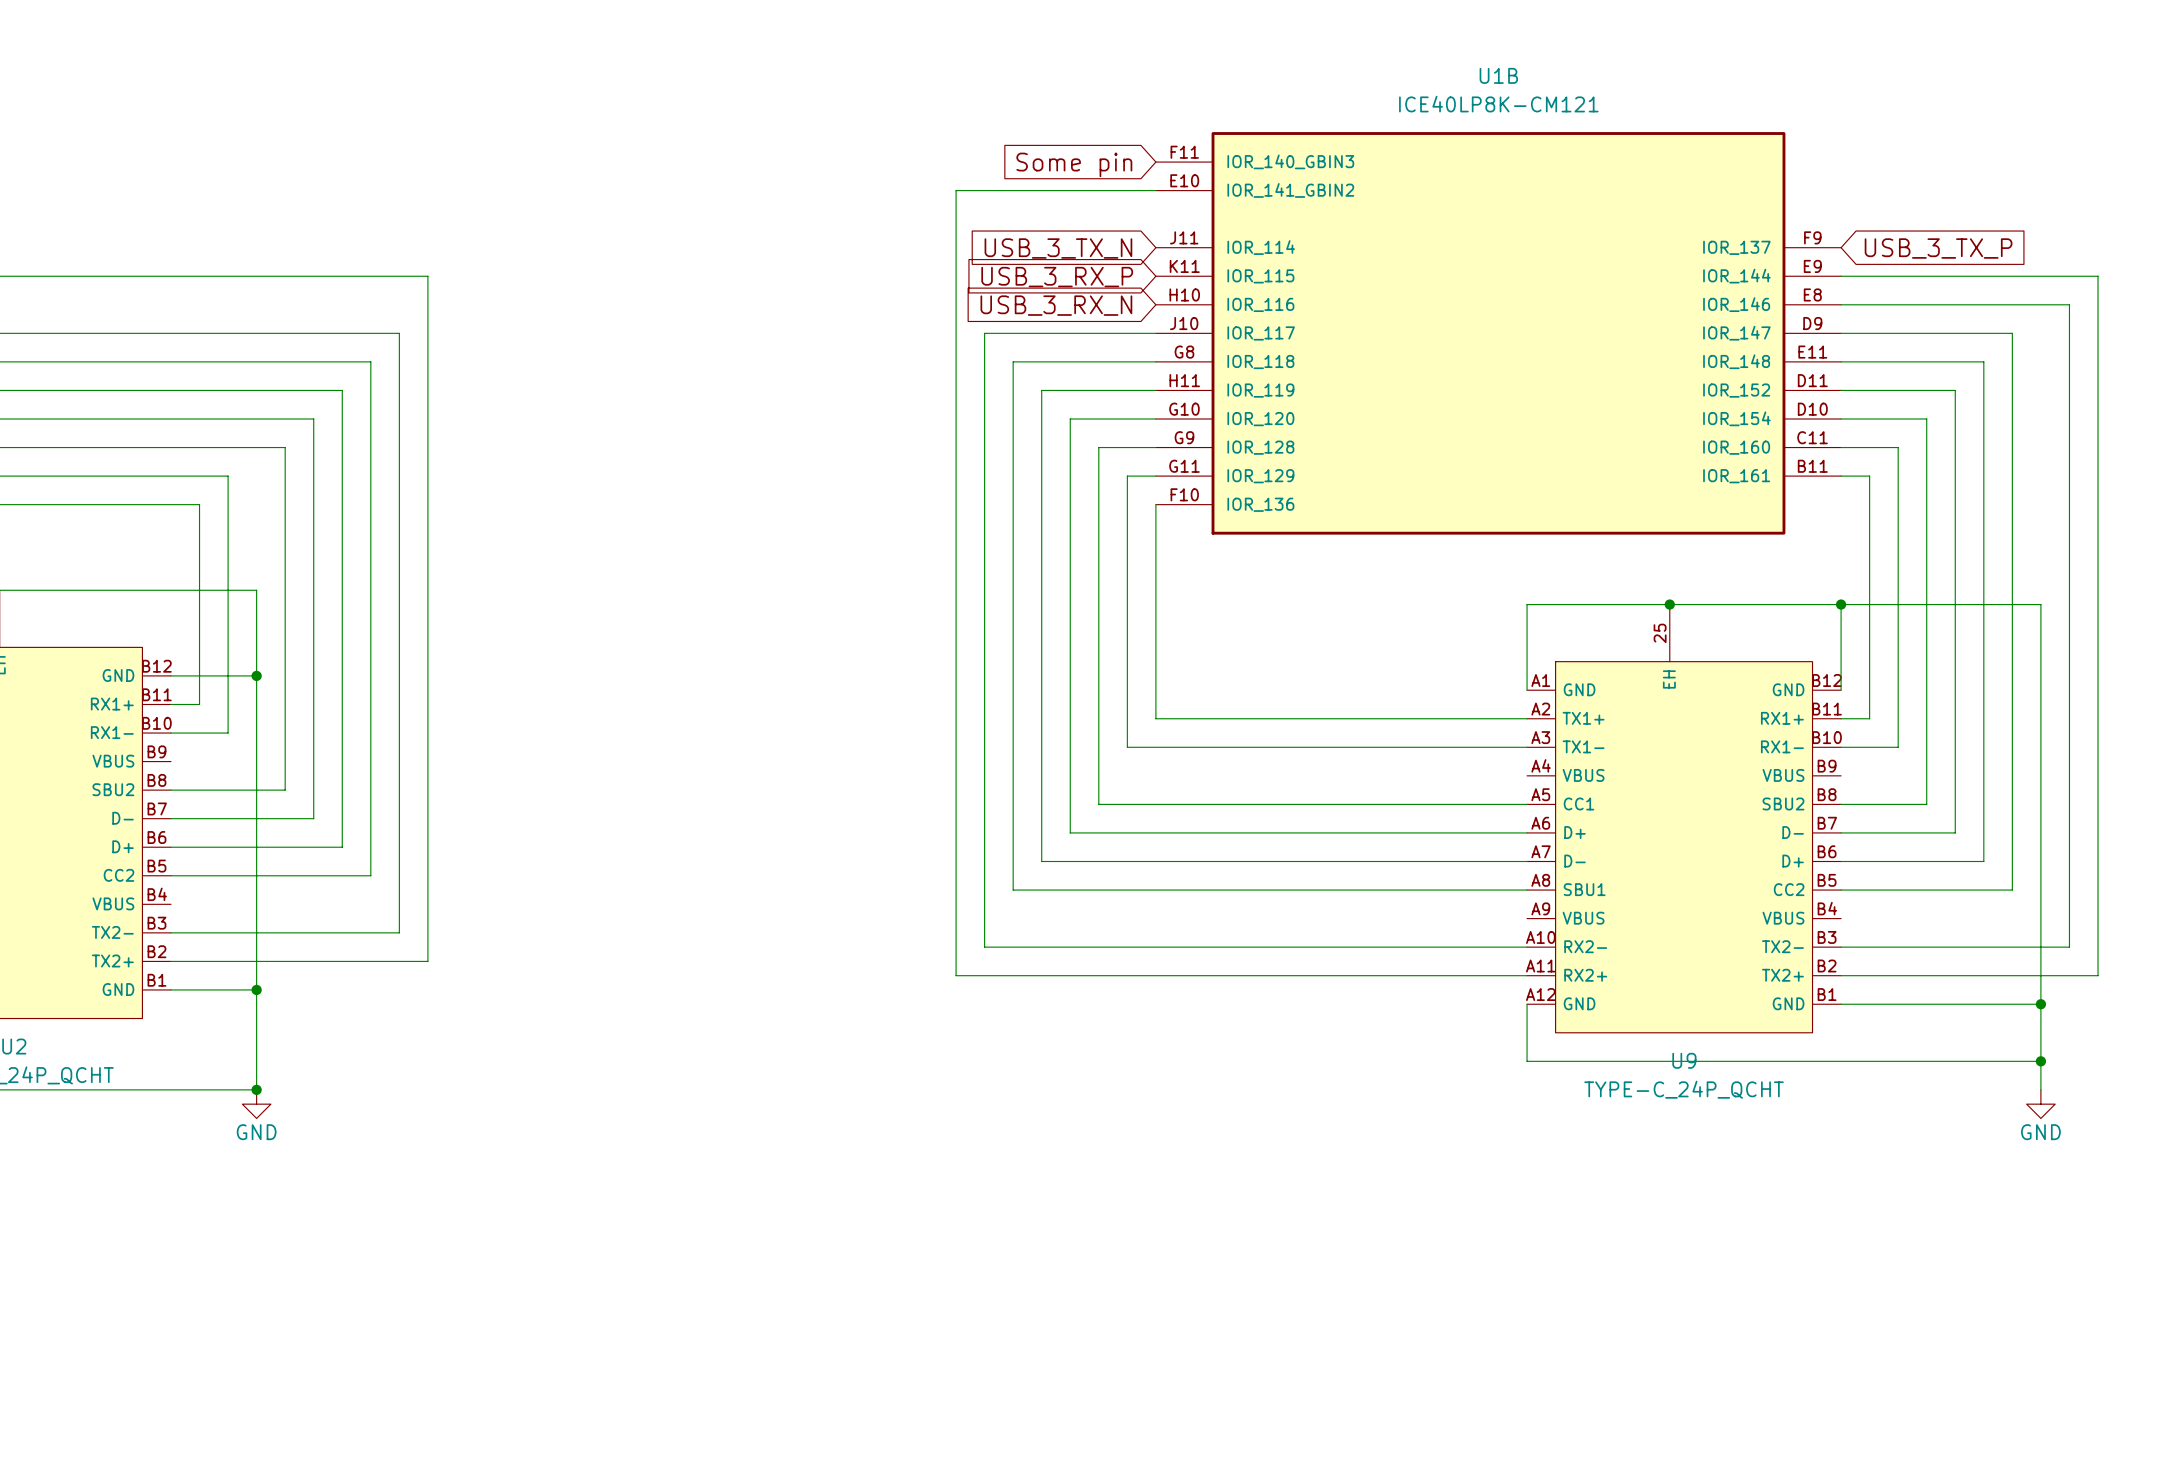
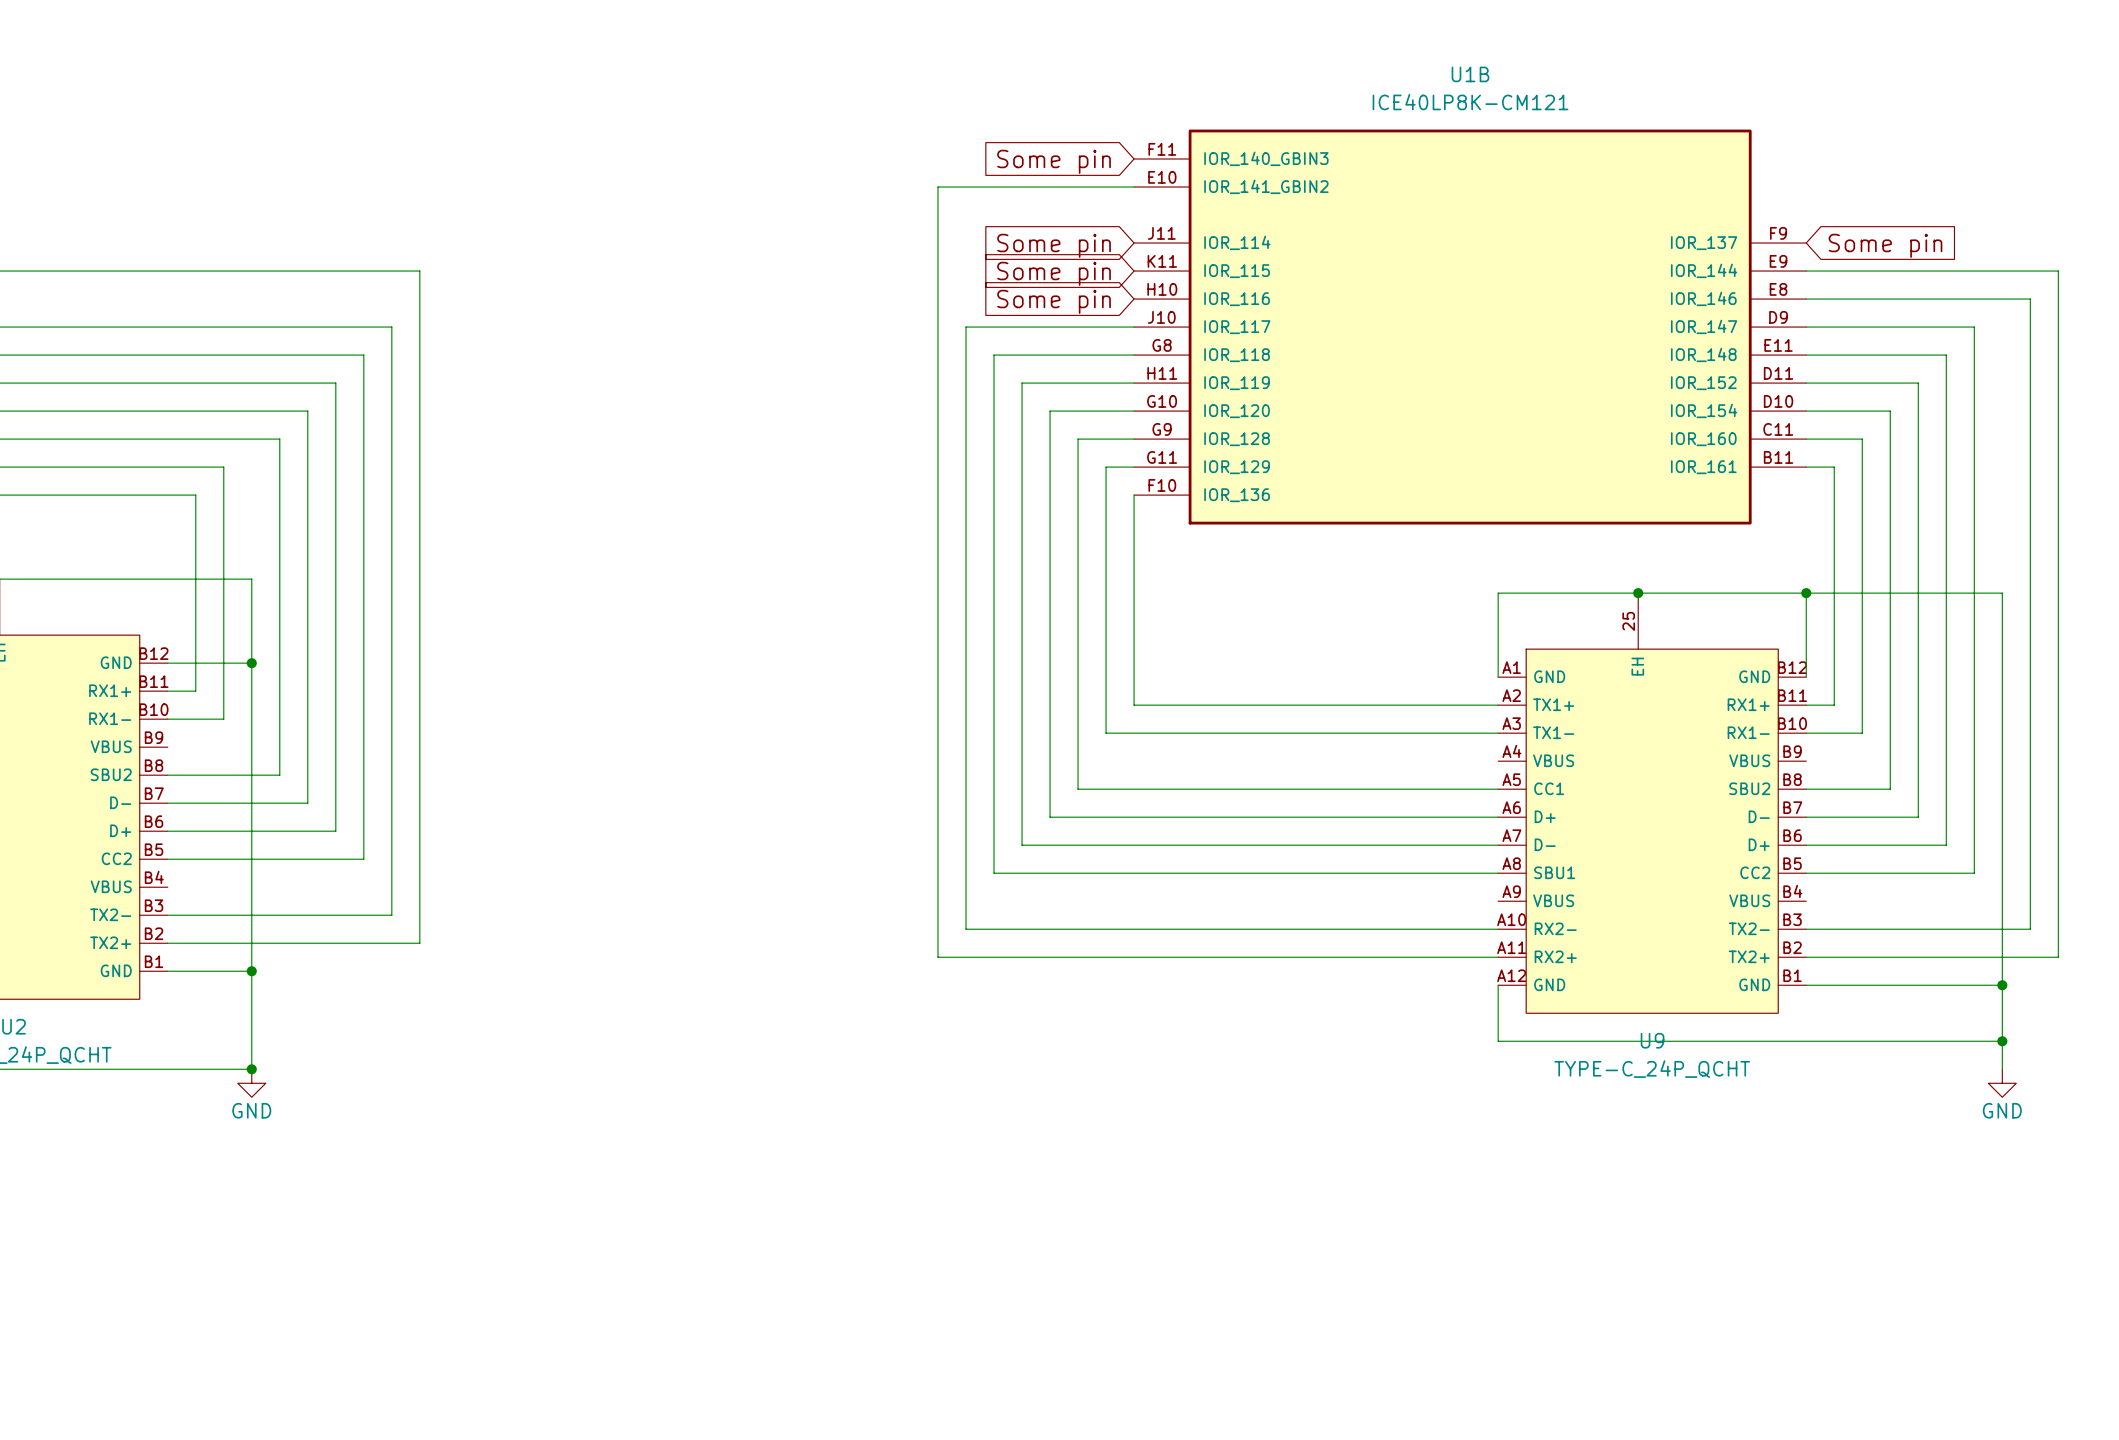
global label: USB_3_TX_N (1058, 248) -> Some pin (1054, 245)
global label: USB_3_TX_P (1938, 248) -> Some pin (1885, 245)
global label: USB_3_RX_P (1057, 277) -> Some pin (1054, 273)
global label: USB_3_RX_N (1056, 305) -> Some pin (1054, 301)

